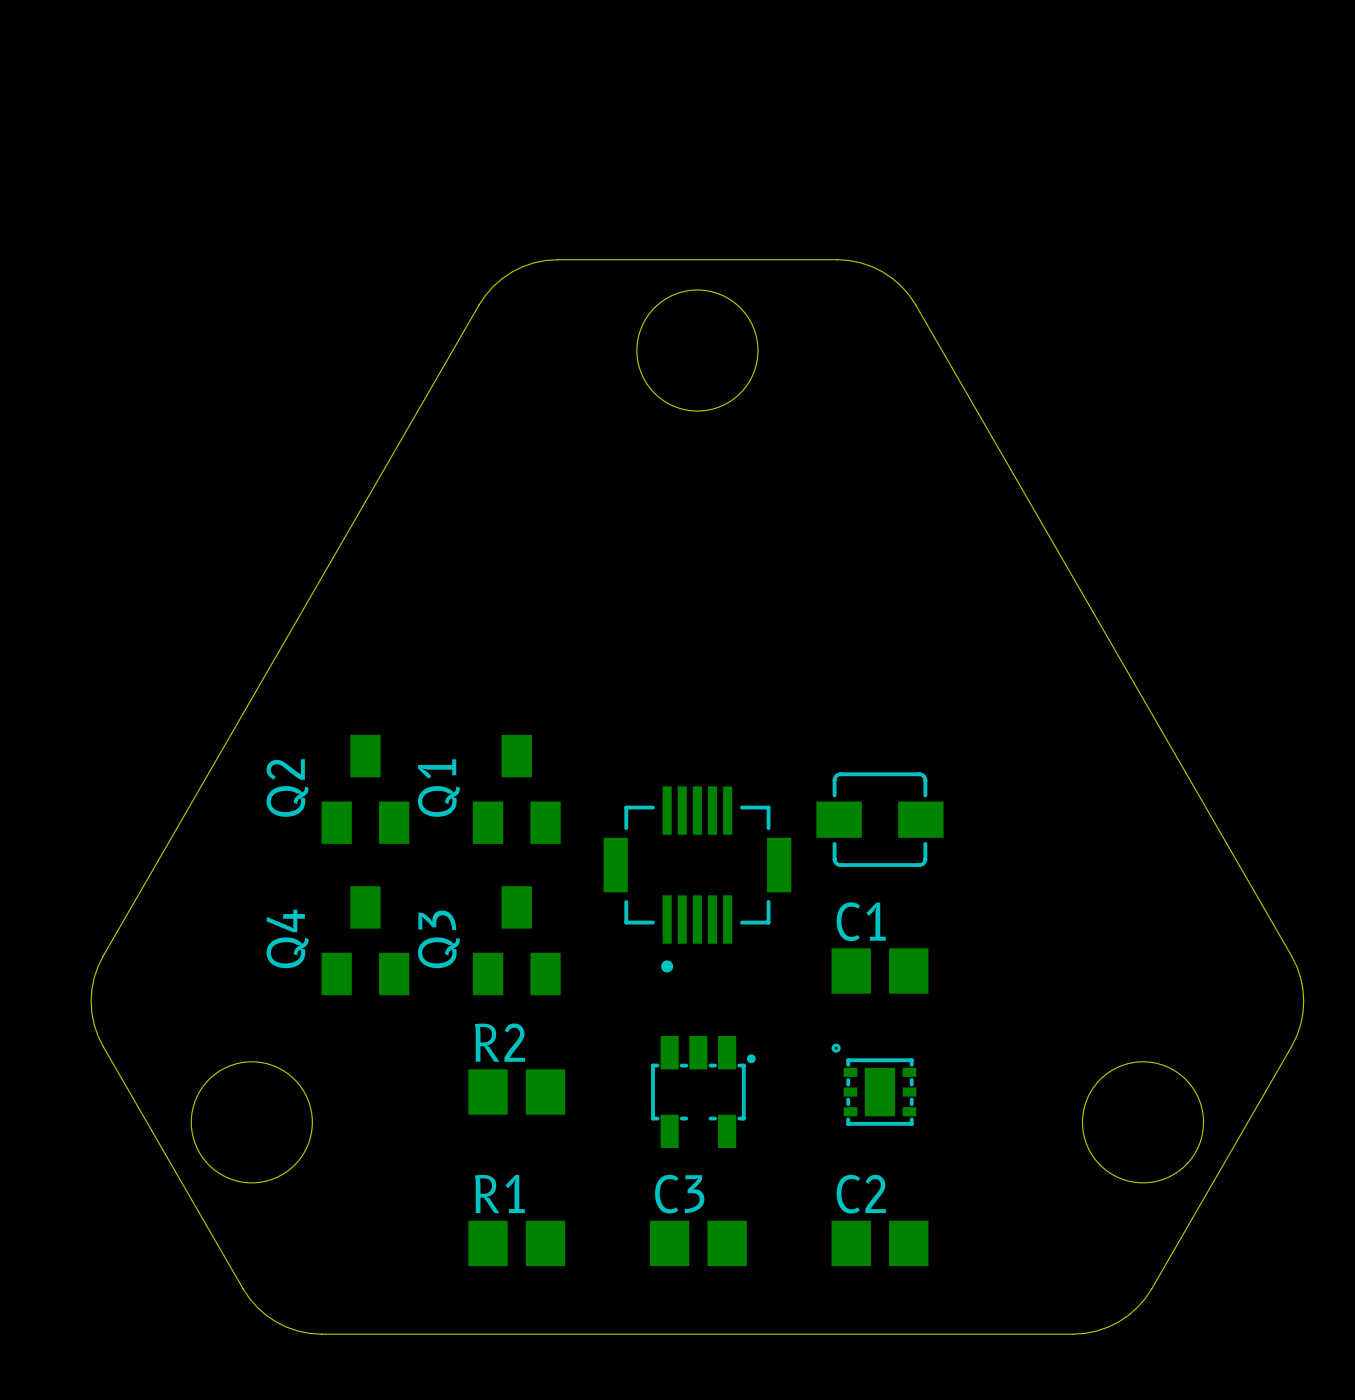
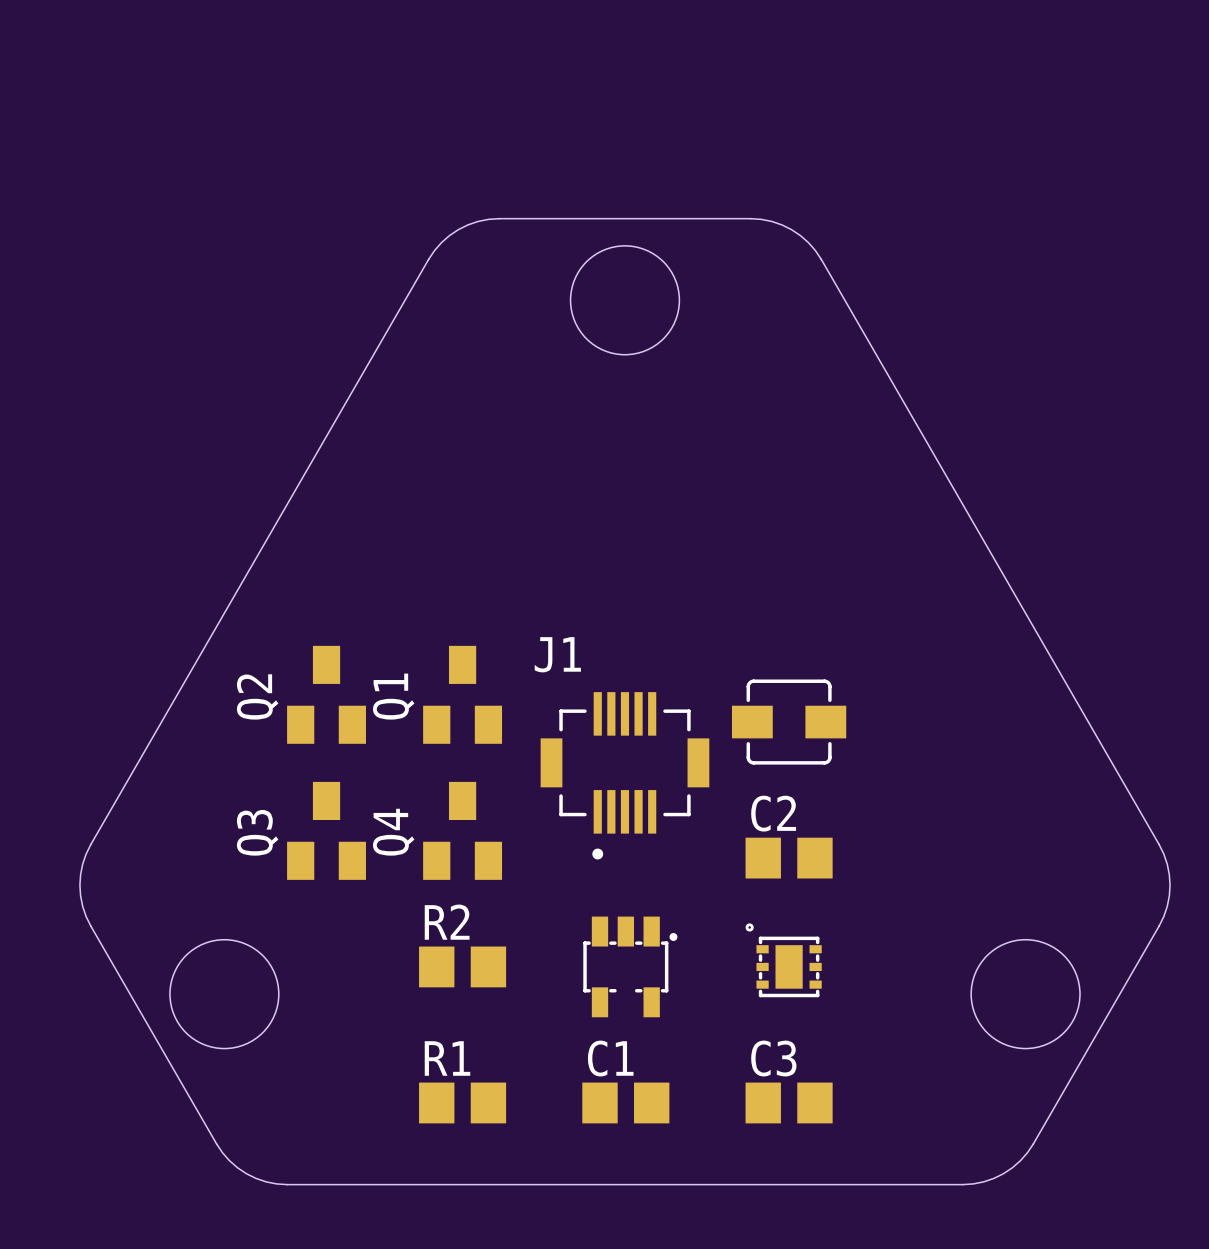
J1 name: none -> J1 (557, 654)
C1 name: C1 (861, 921) -> C2 (773, 813)
Q4 name: Q4 (287, 938) -> Q3 (257, 832)
Q3 name: Q3 (438, 939) -> Q4 (393, 832)
C3 name: C3 (679, 1194) -> C1 (610, 1058)
C2 name: C2 (861, 1194) -> C3 (773, 1058)

